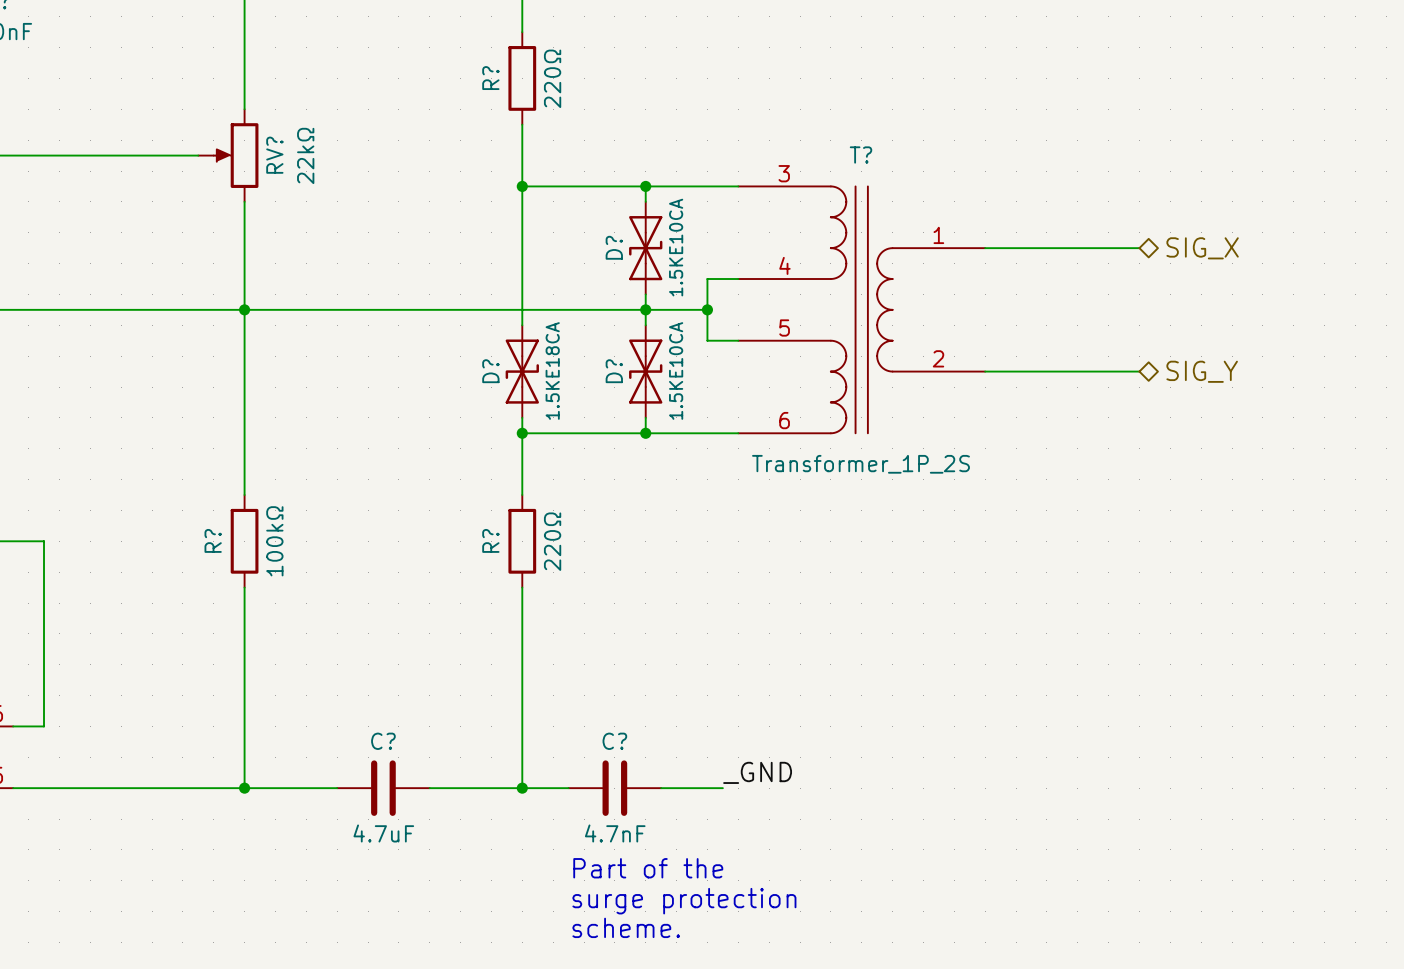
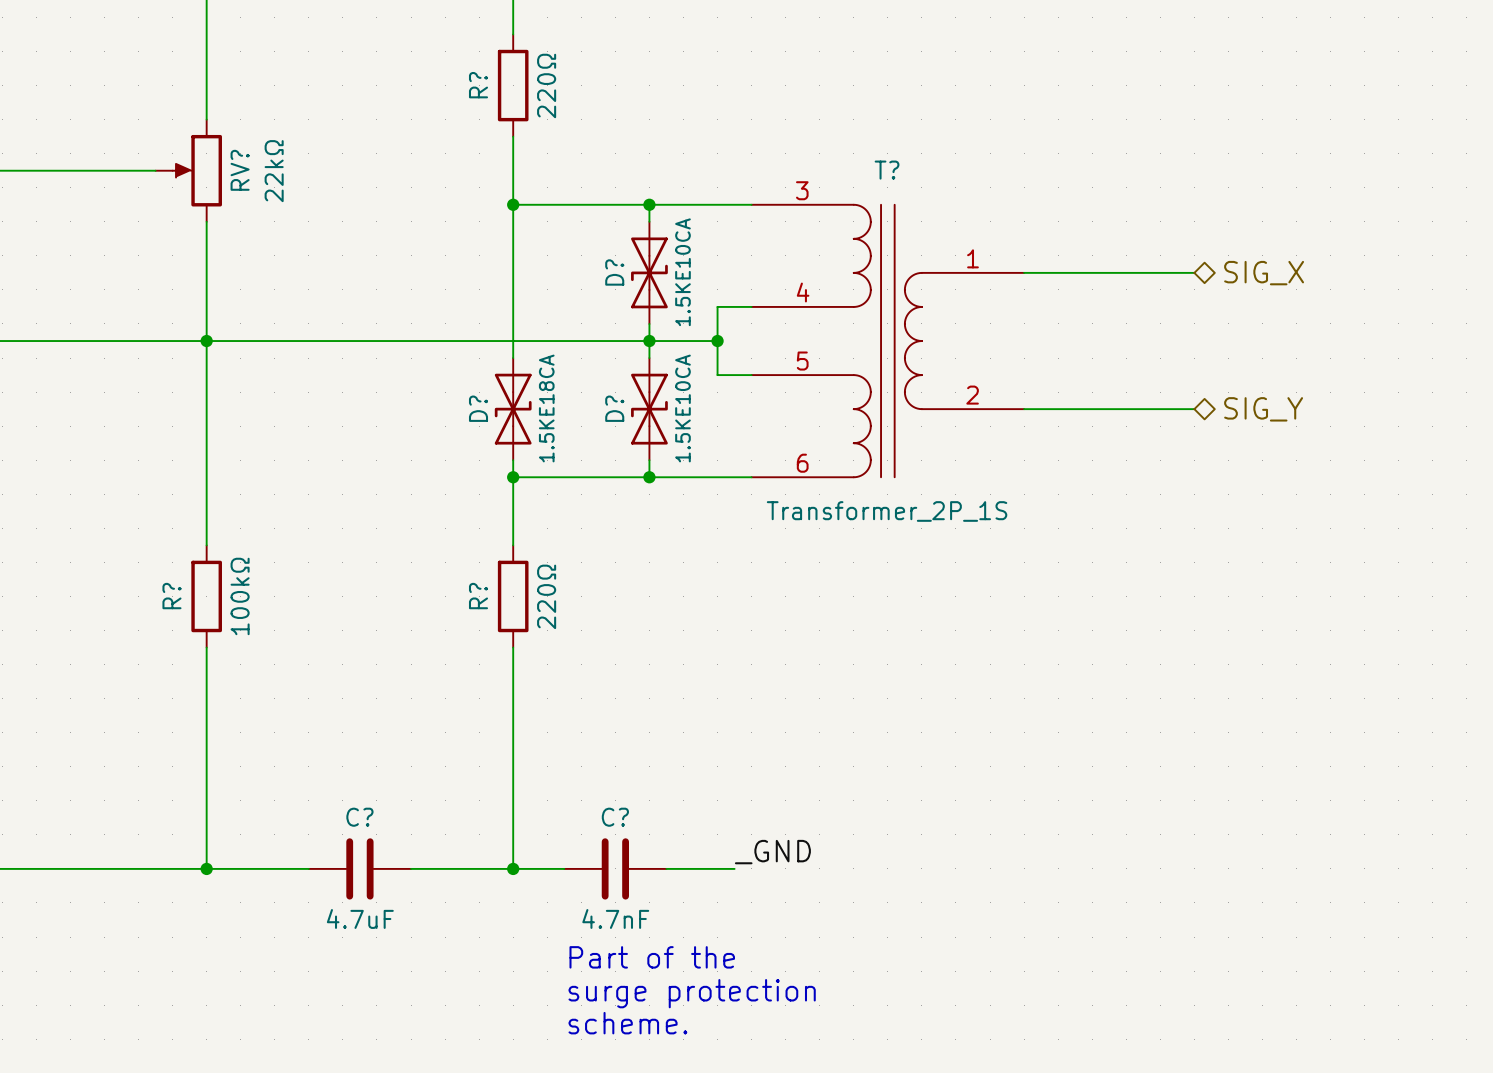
T? value: Transformer_1P_2S (860, 464) -> Transformer_2P_1S (887, 511)

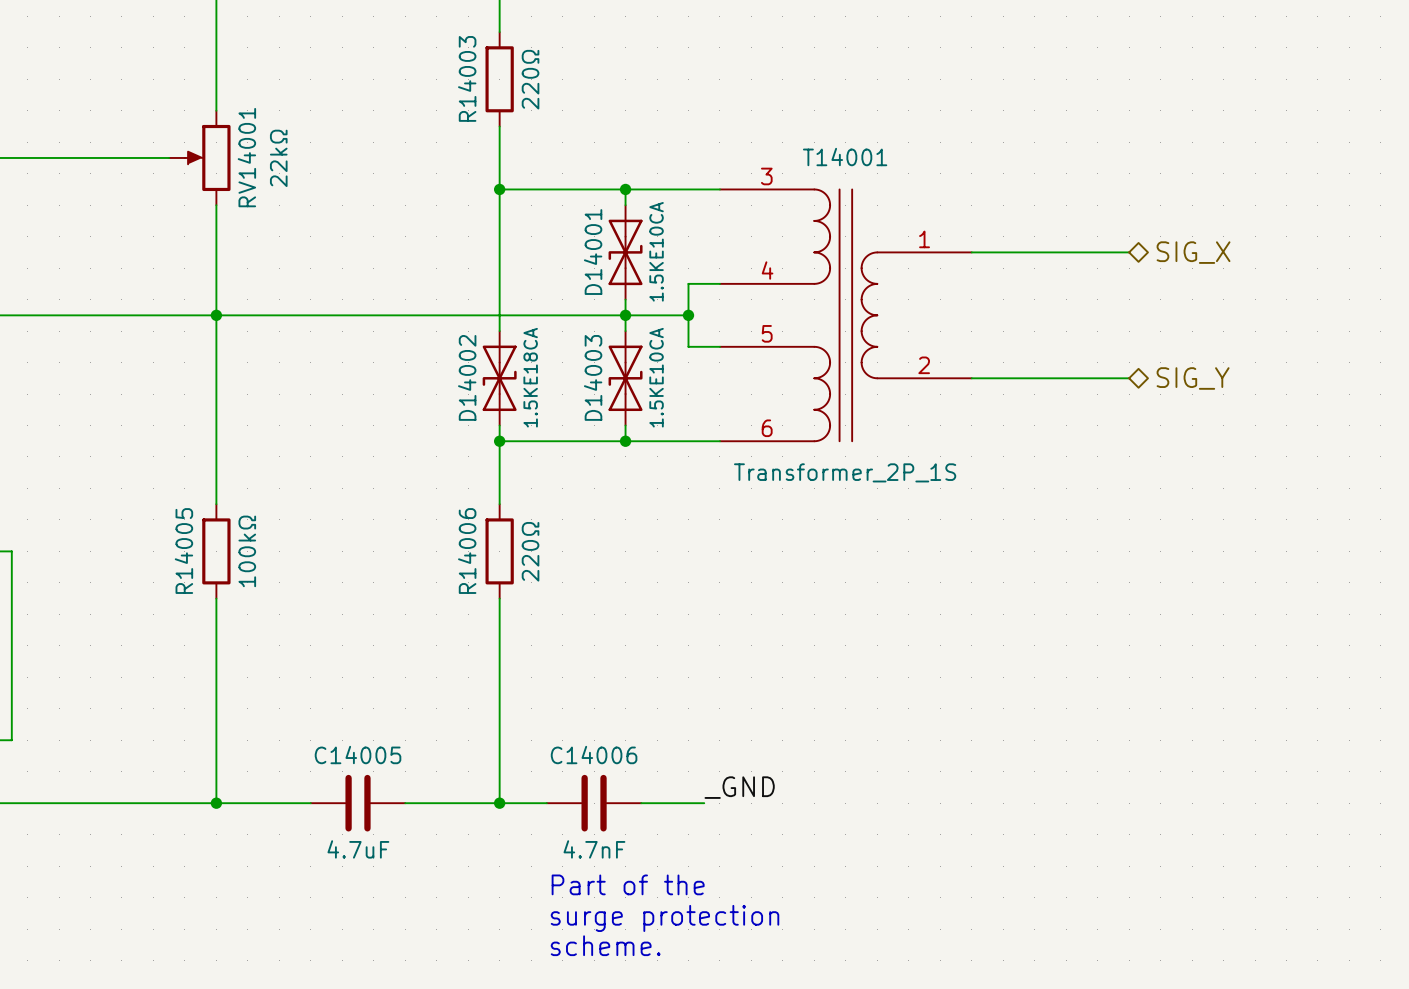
R? name: R? (478, 85) -> R14003 (467, 78)
RV? name: RV? (240, 170) -> RV14001 (246, 157)
T? name: T? (887, 170) -> T14001 (845, 157)
D? name: D? (614, 272) -> D14001 (593, 252)
D? name: D? (478, 408) -> D14002 (467, 377)
D? name: D? (614, 408) -> D14003 (593, 377)
R? name: R? (171, 596) -> R14005 (183, 551)
R? name: R? (478, 596) -> R14006 (467, 551)
C? name: C? (359, 817) -> C14005 (358, 755)
C? name: C? (615, 817) -> C14006 (594, 755)

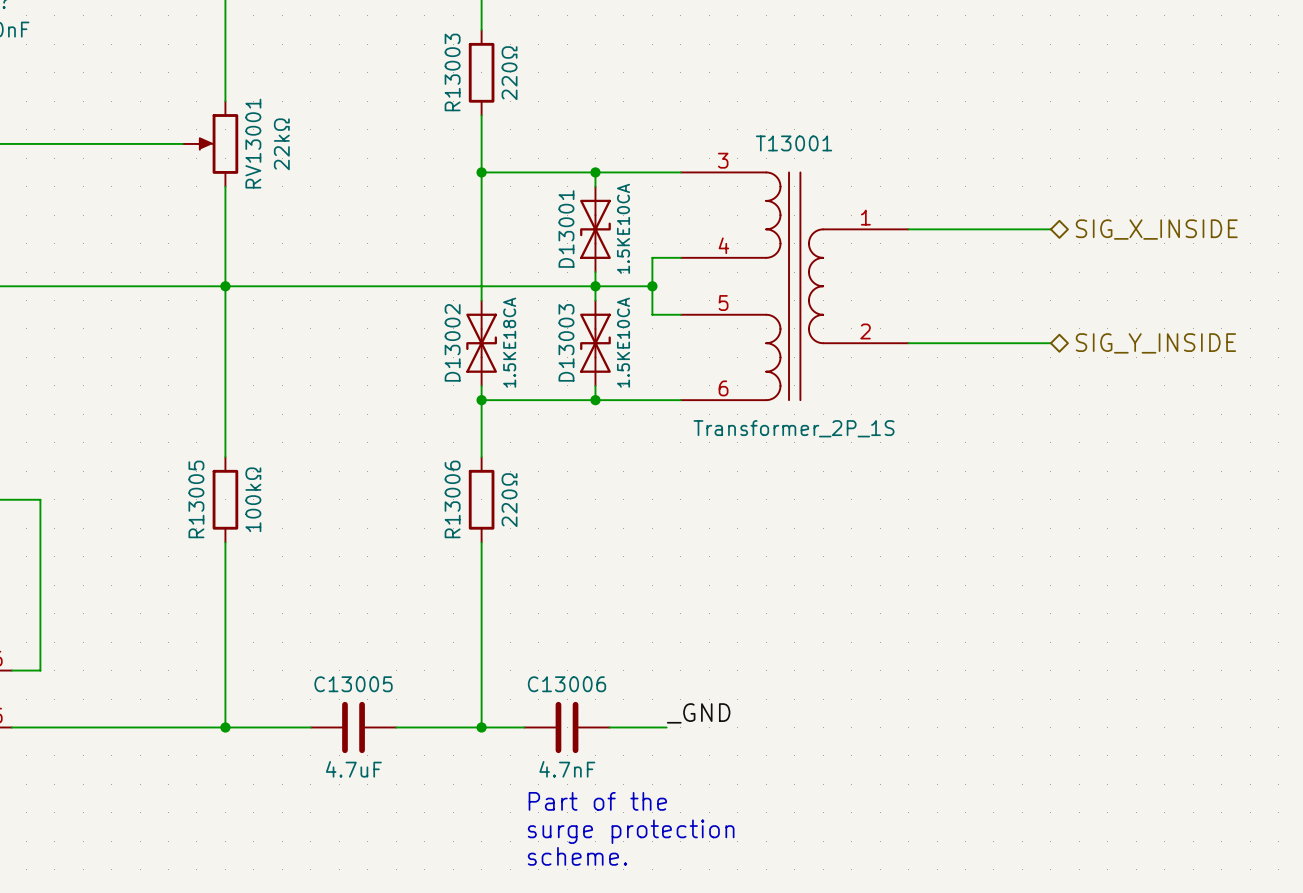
R14003 name: R14003 (467, 78) -> R13003 (452, 72)
RV14001 name: RV14001 (246, 157) -> RV13001 (253, 143)
T14001 name: T14001 (845, 157) -> T13001 (794, 143)
D14001 name: D14001 (593, 252) -> D13001 (566, 229)
hierarchical label: SIG_X (1193, 252) -> SIG_X_INSIDE (1156, 229)
D14002 name: D14002 (467, 377) -> D13002 (452, 342)
D14003 name: D14003 (593, 377) -> D13003 (566, 342)
hierarchical label: SIG_Y (1193, 378) -> SIG_Y_INSIDE (1155, 343)
R14005 name: R14005 (183, 551) -> R13005 (196, 499)
R14006 name: R14006 (467, 551) -> R13006 (452, 499)
C14005 name: C14005 (358, 755) -> C13005 (353, 684)
C14006 name: C14006 (594, 755) -> C13006 (567, 684)

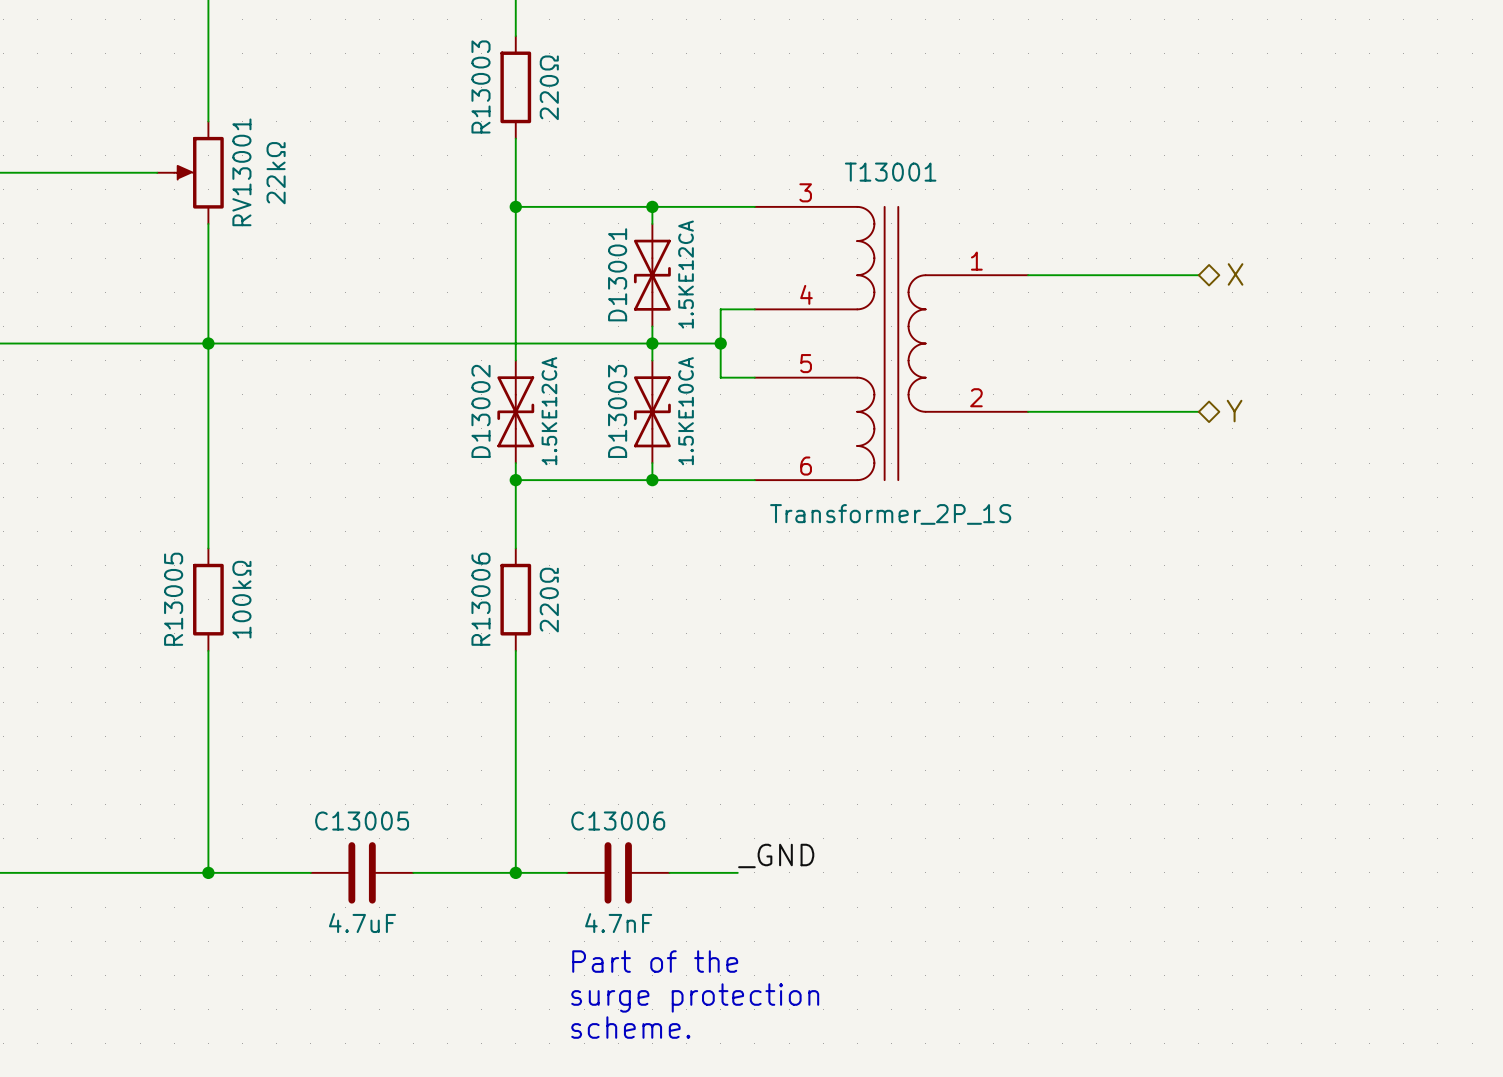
D13001 value: 1.5KE10CA (623, 228) -> 1.5KE12CA (686, 274)
hierarchical label: SIG_X_INSIDE (1156, 229) -> X (1235, 274)
D13002 value: 1.5KE18CA (509, 342) -> 1.5KE12CA (549, 411)
hierarchical label: SIG_Y_INSIDE (1155, 343) -> Y (1234, 411)

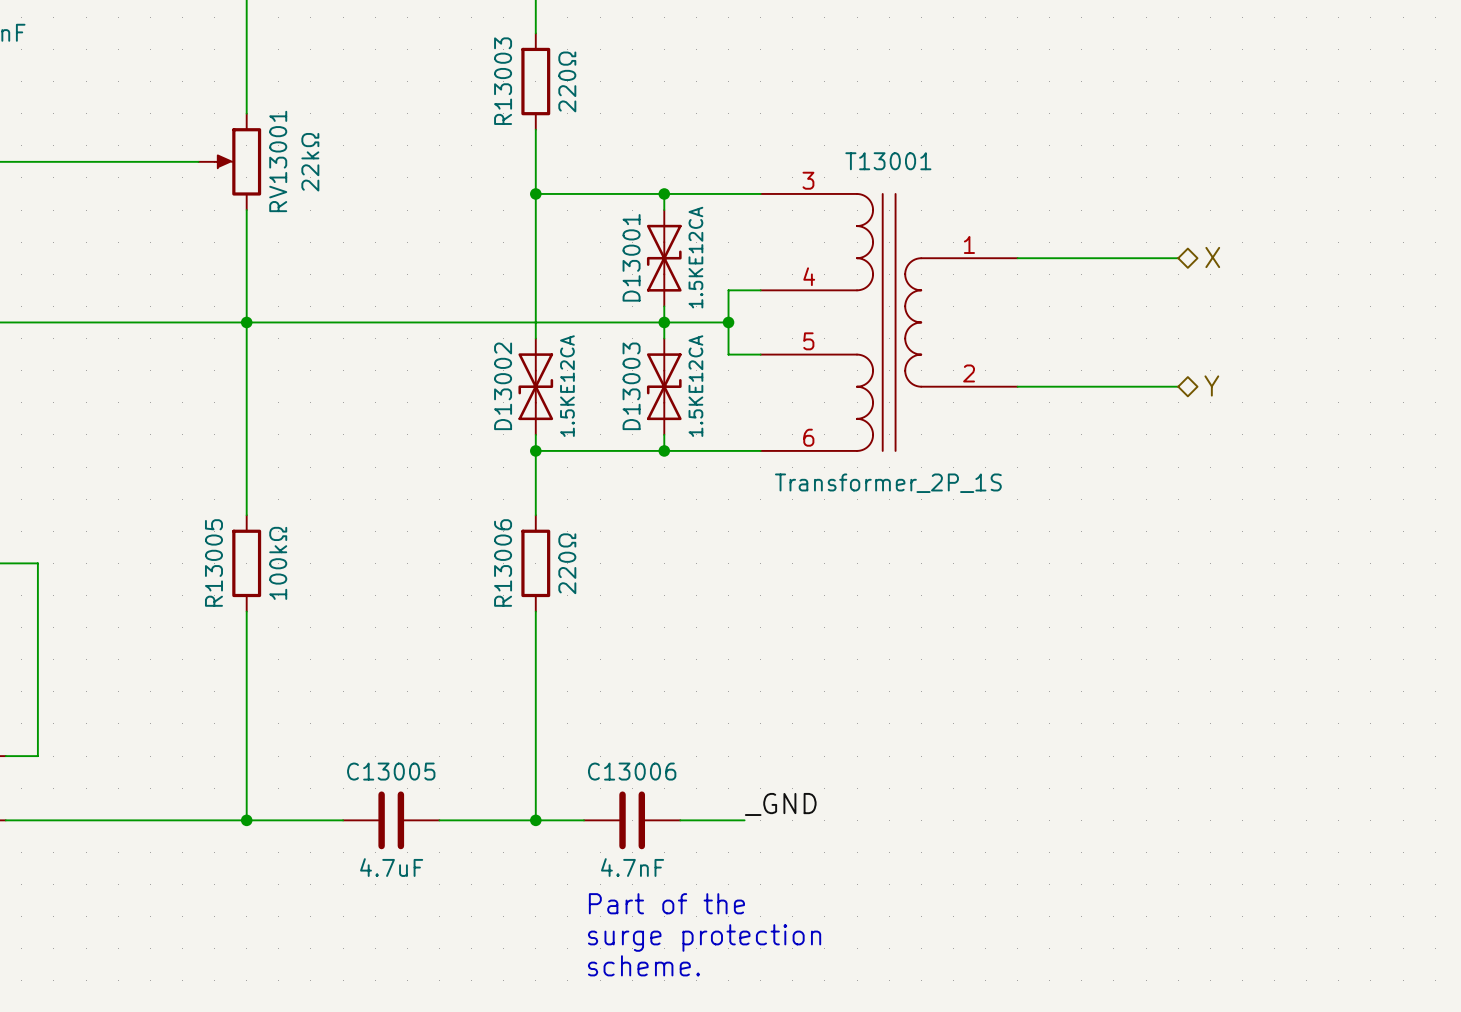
D13003 value: 1.5KE10CA (686, 411) -> 1.5KE12CA (695, 386)

